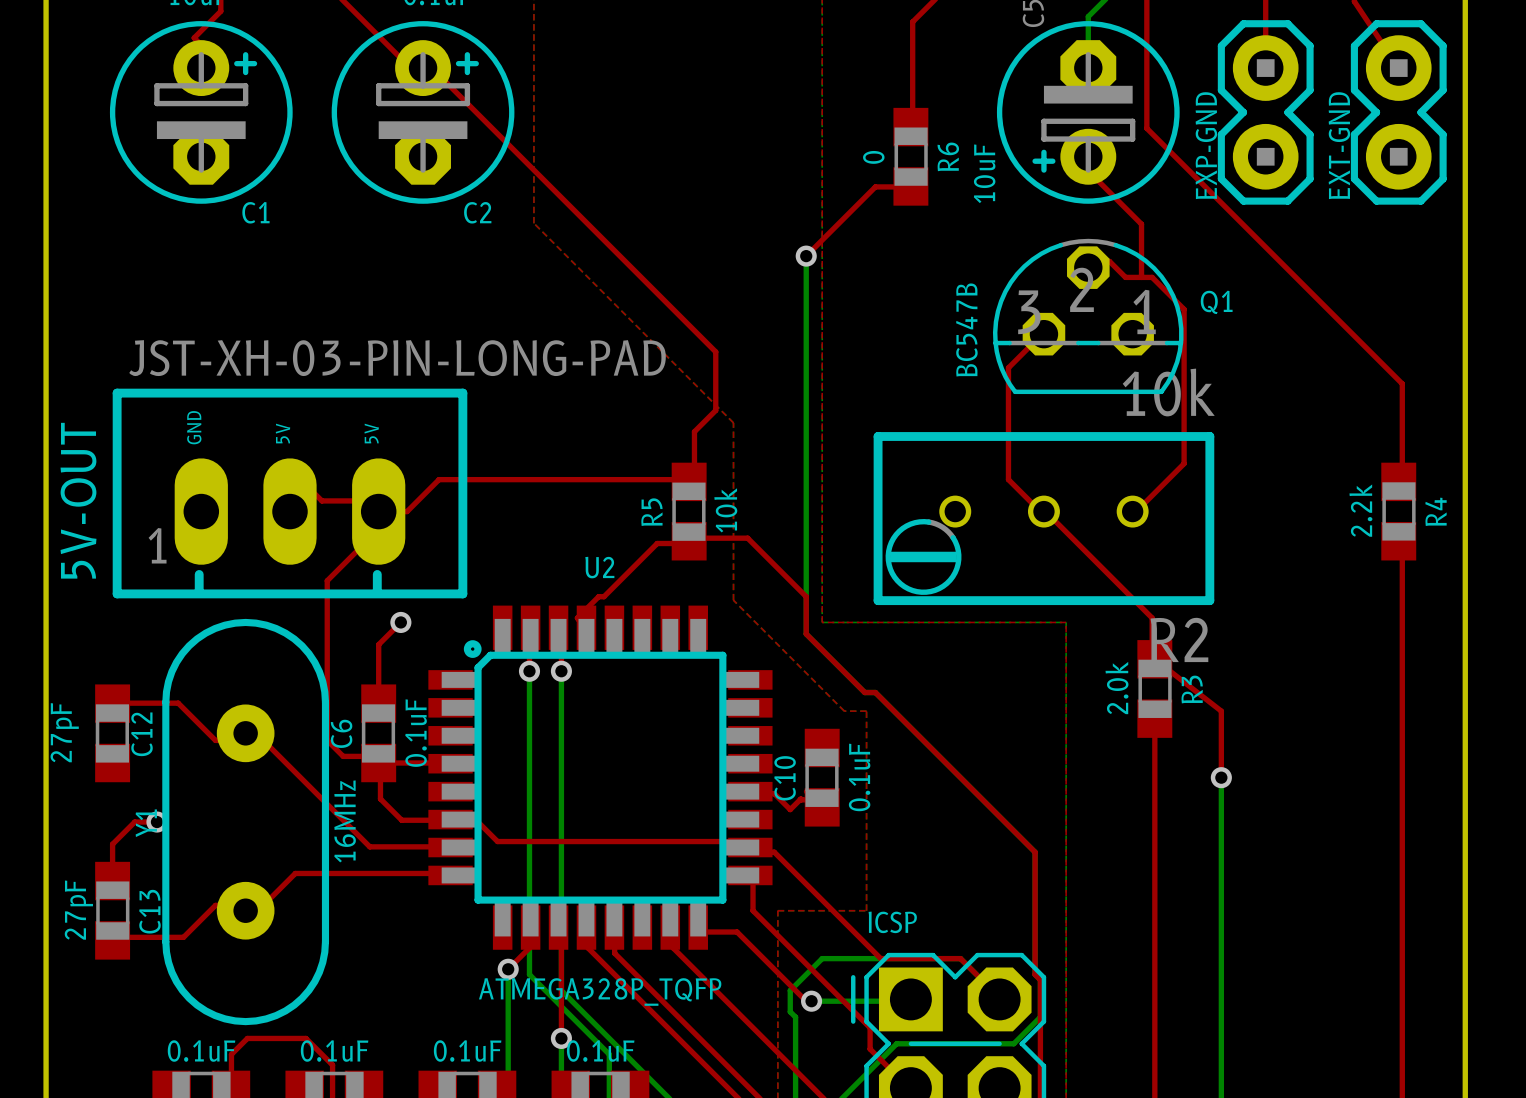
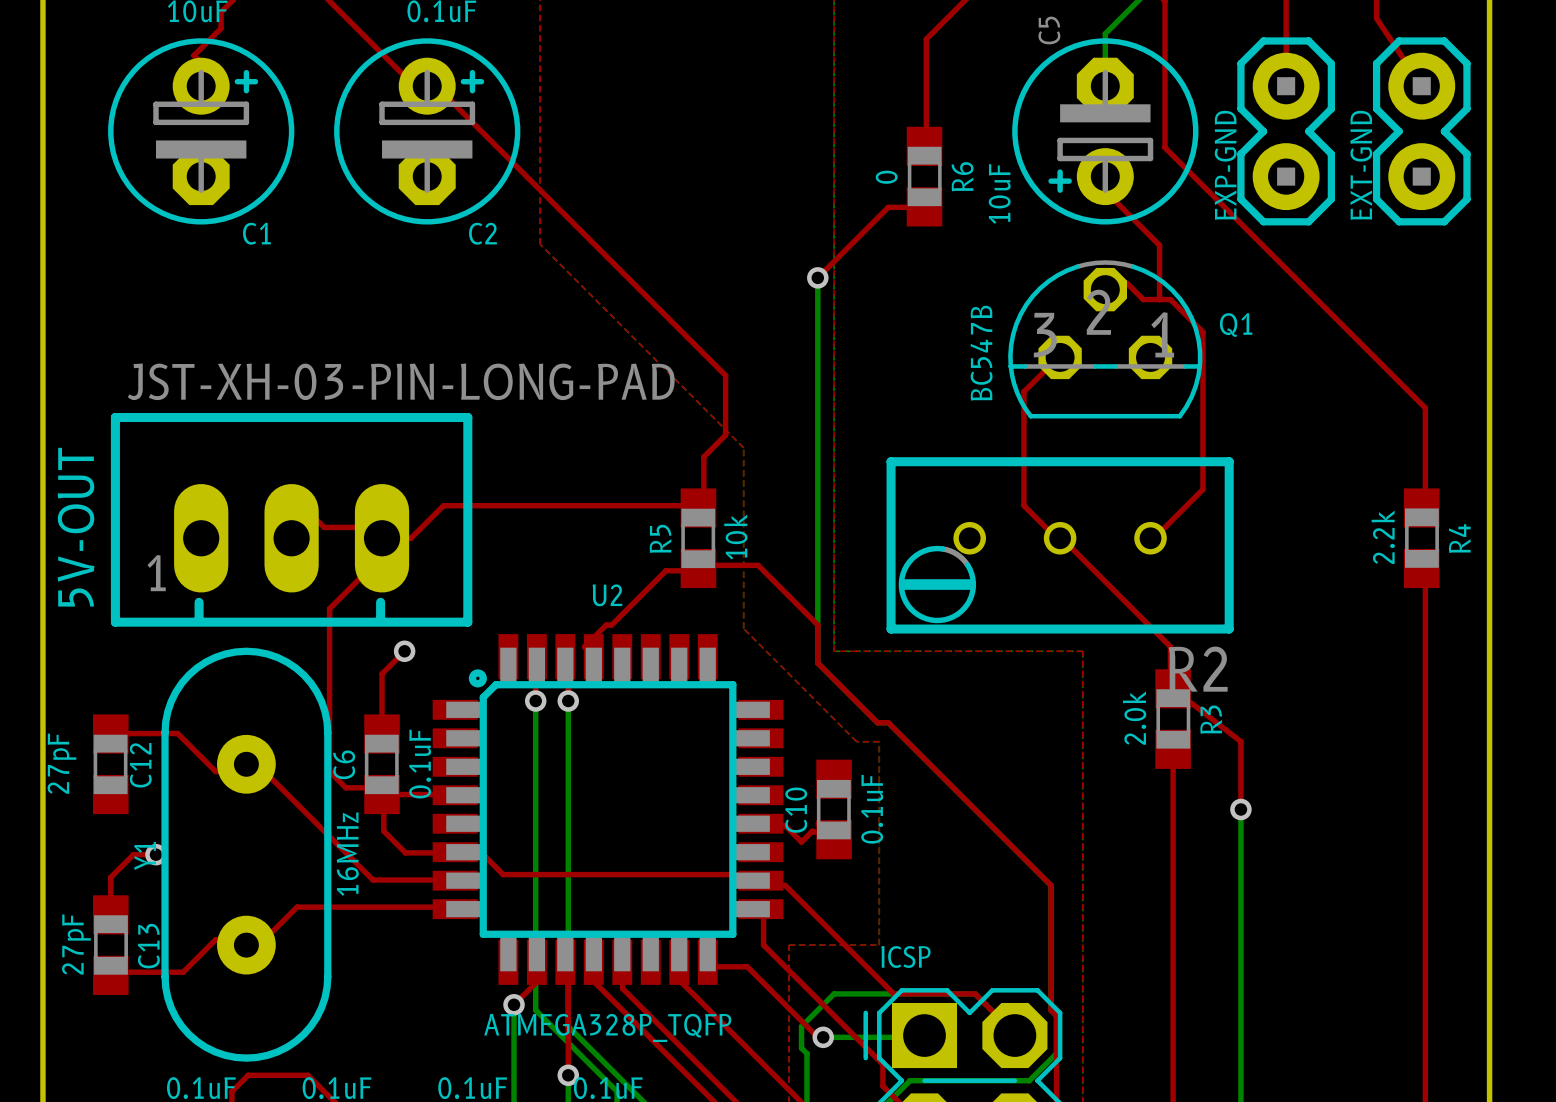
R2 value: 10k (1168, 392) -> none
text: GND (194, 427) -> none
text: 5V (282, 433) -> none
text: 5V (371, 433) -> none

